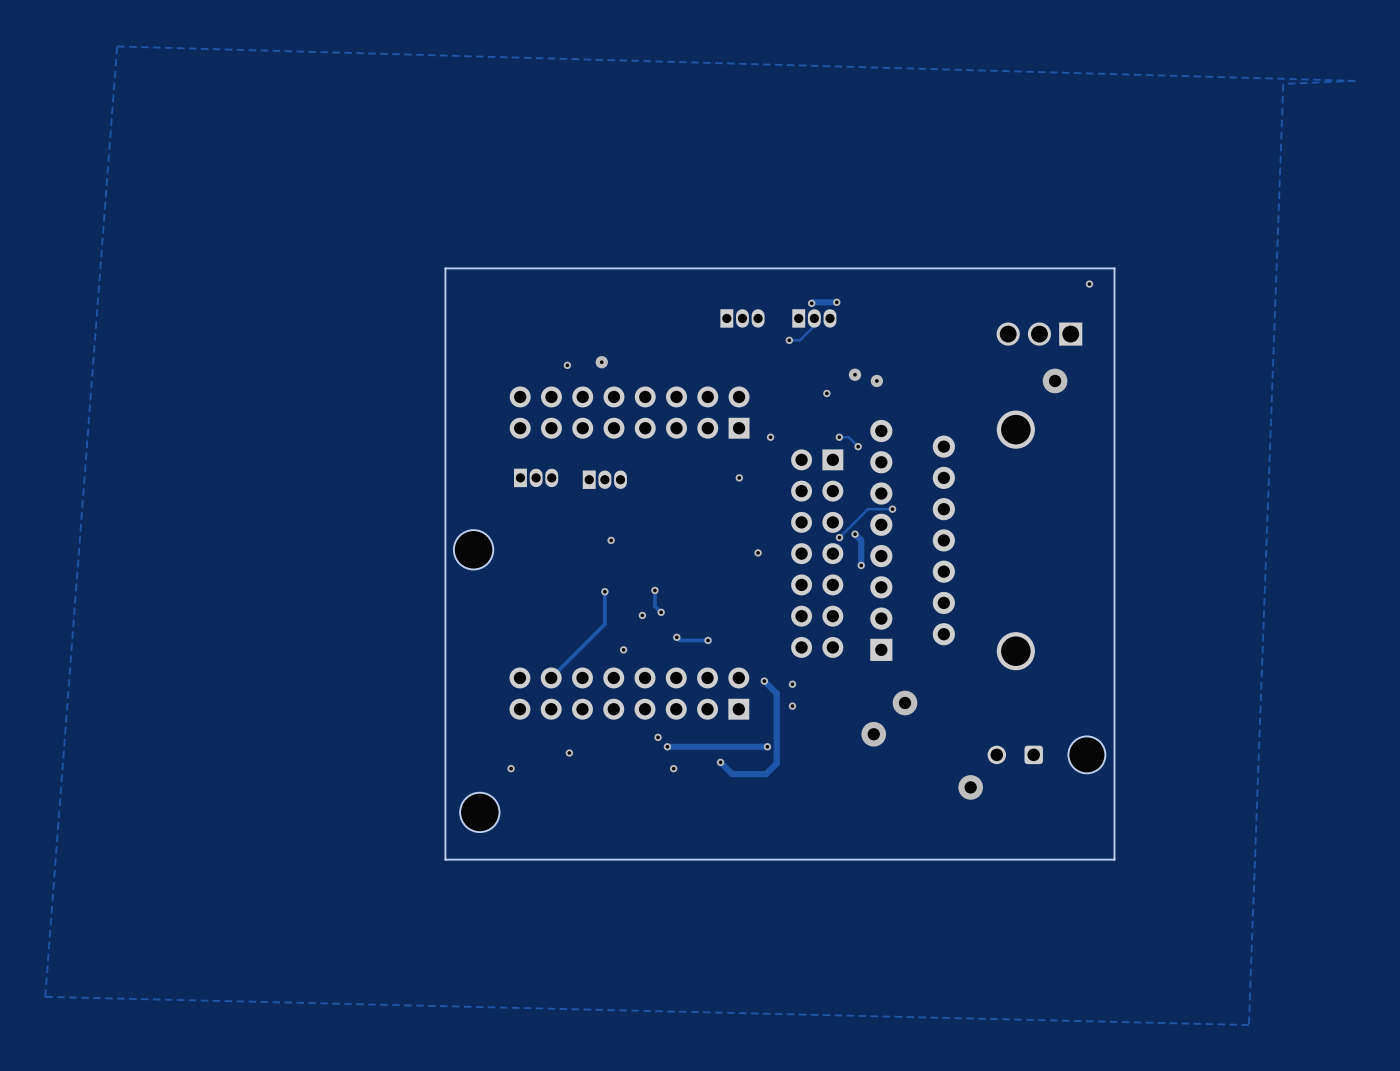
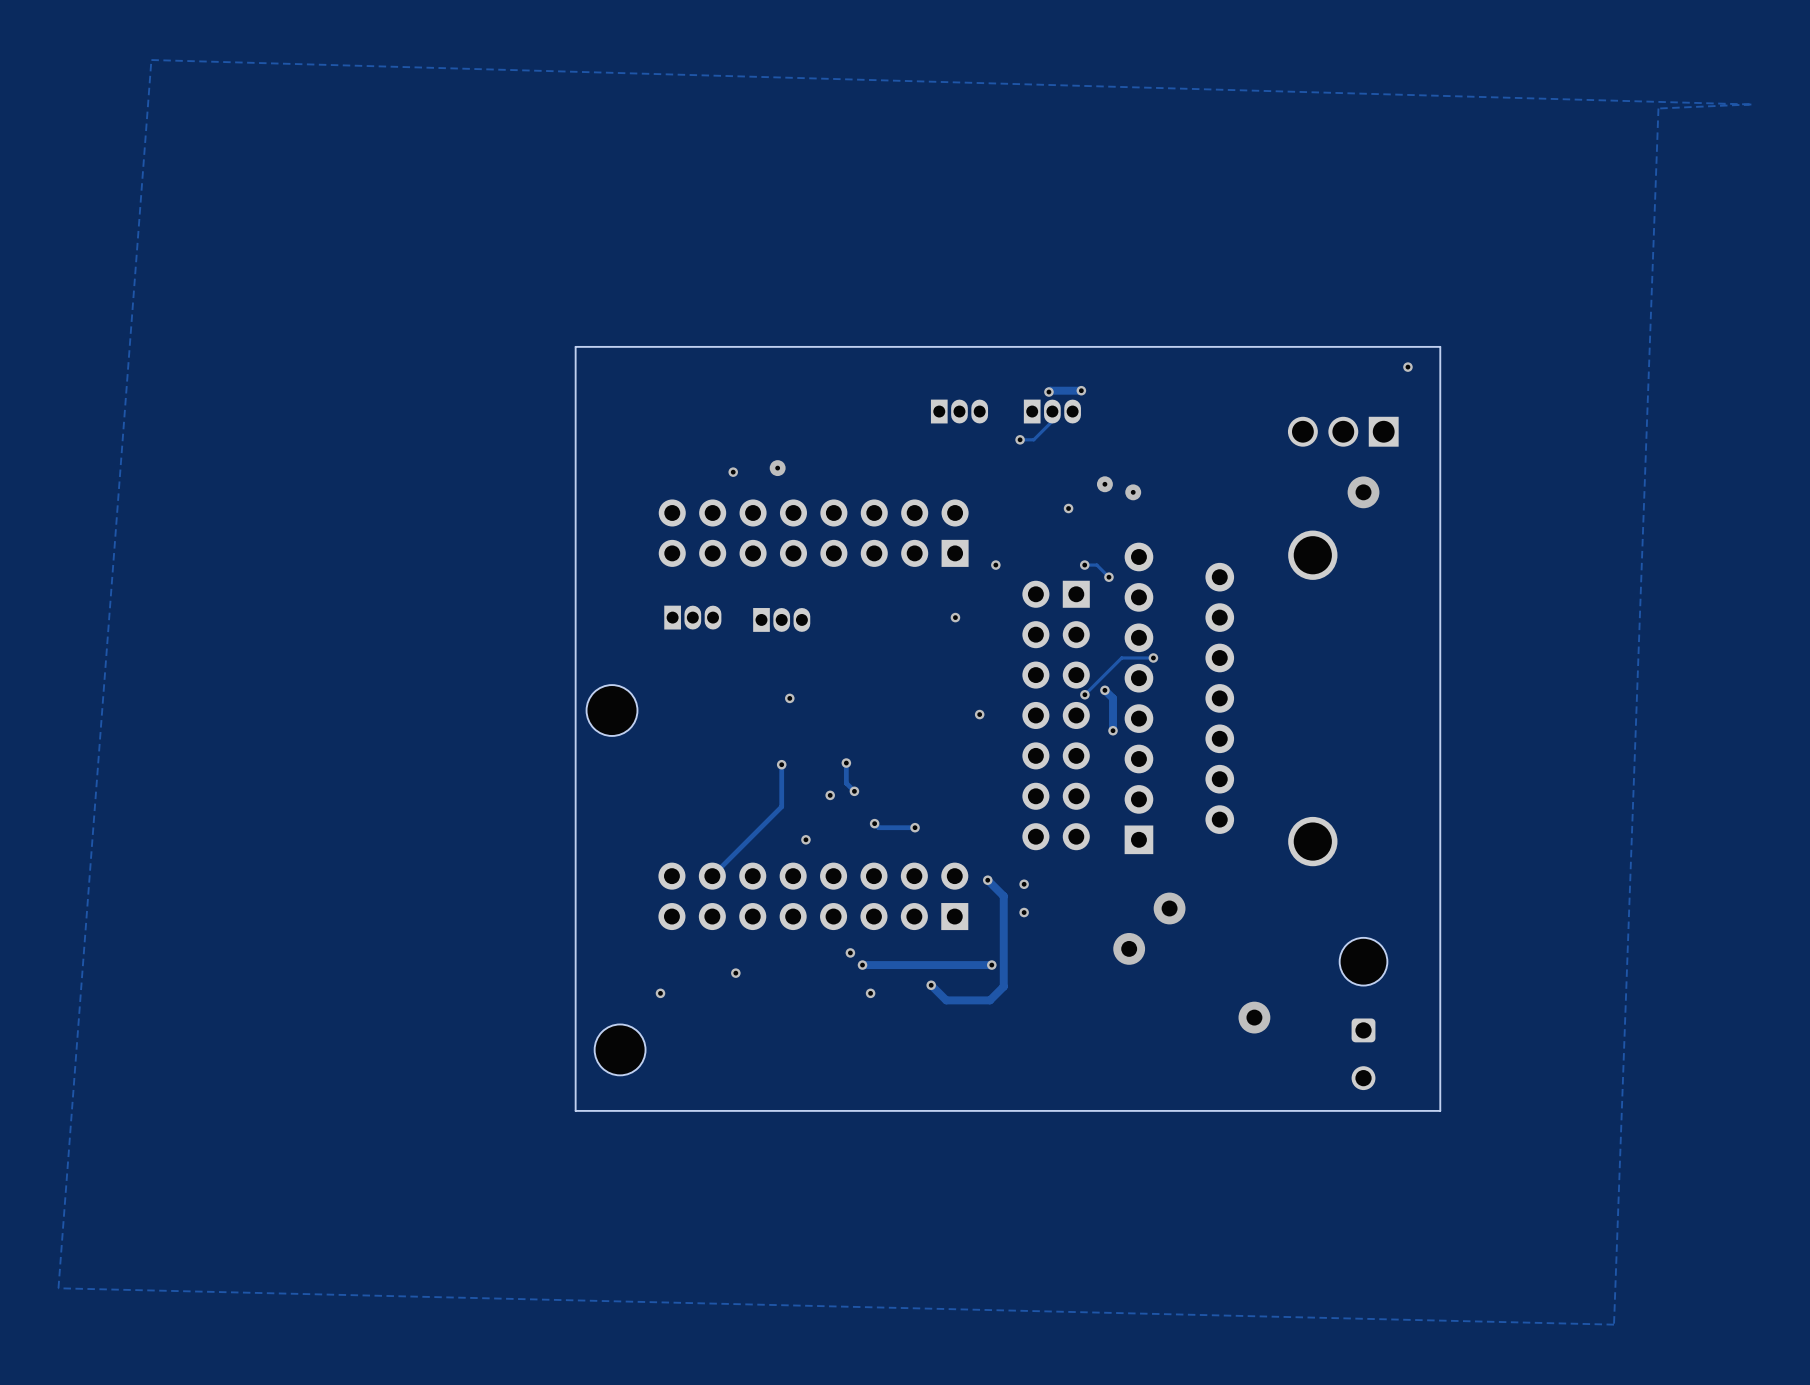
part rotation: 0° (1046, 754) -> 90° counterclockwise (1363, 1013)

